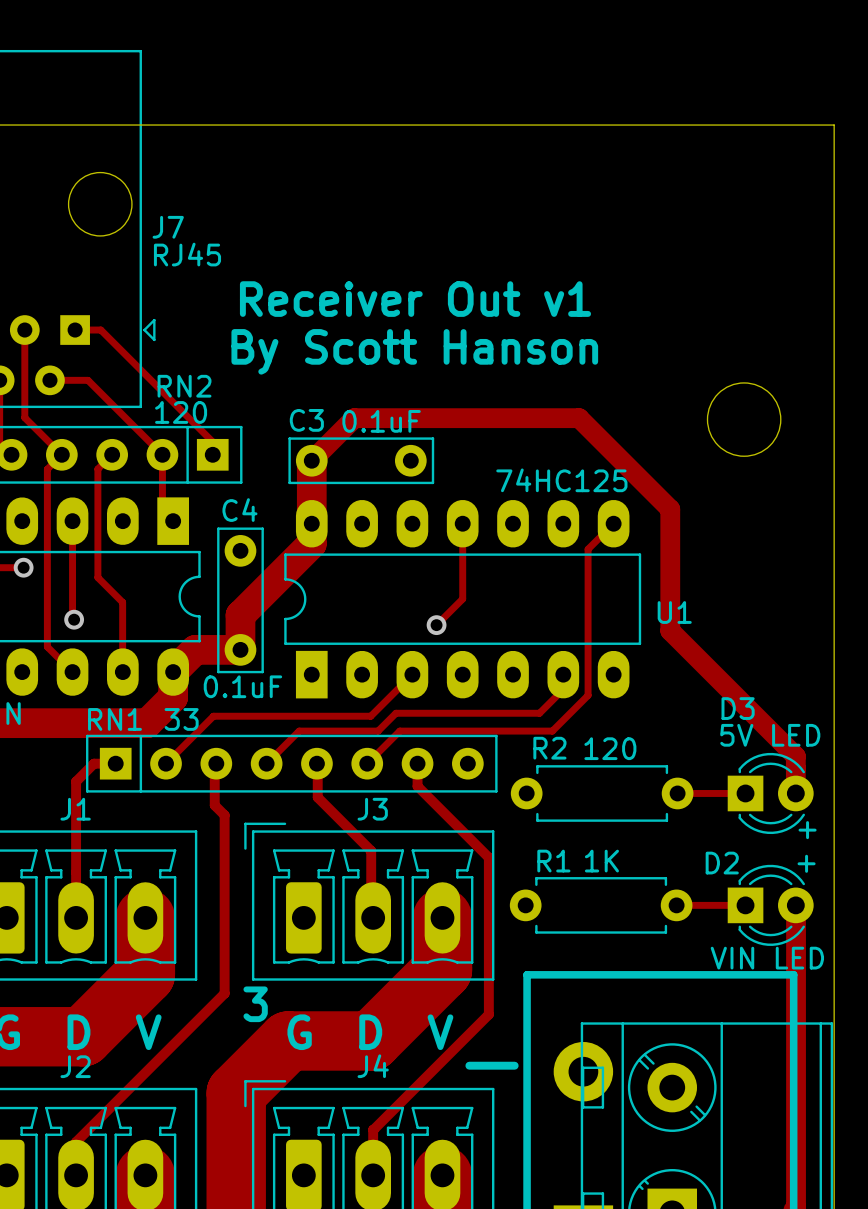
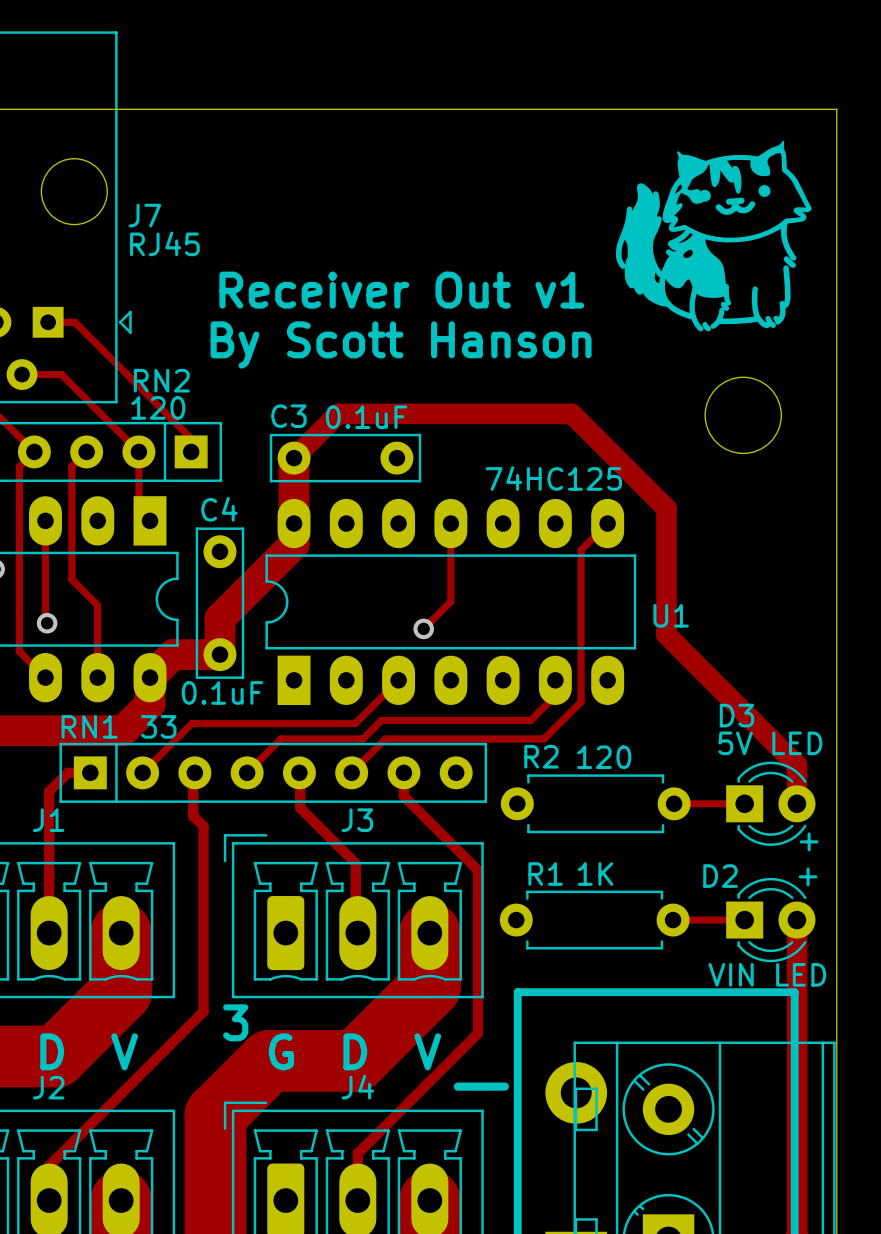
drawing: none -> [616, 140, 812, 332]

